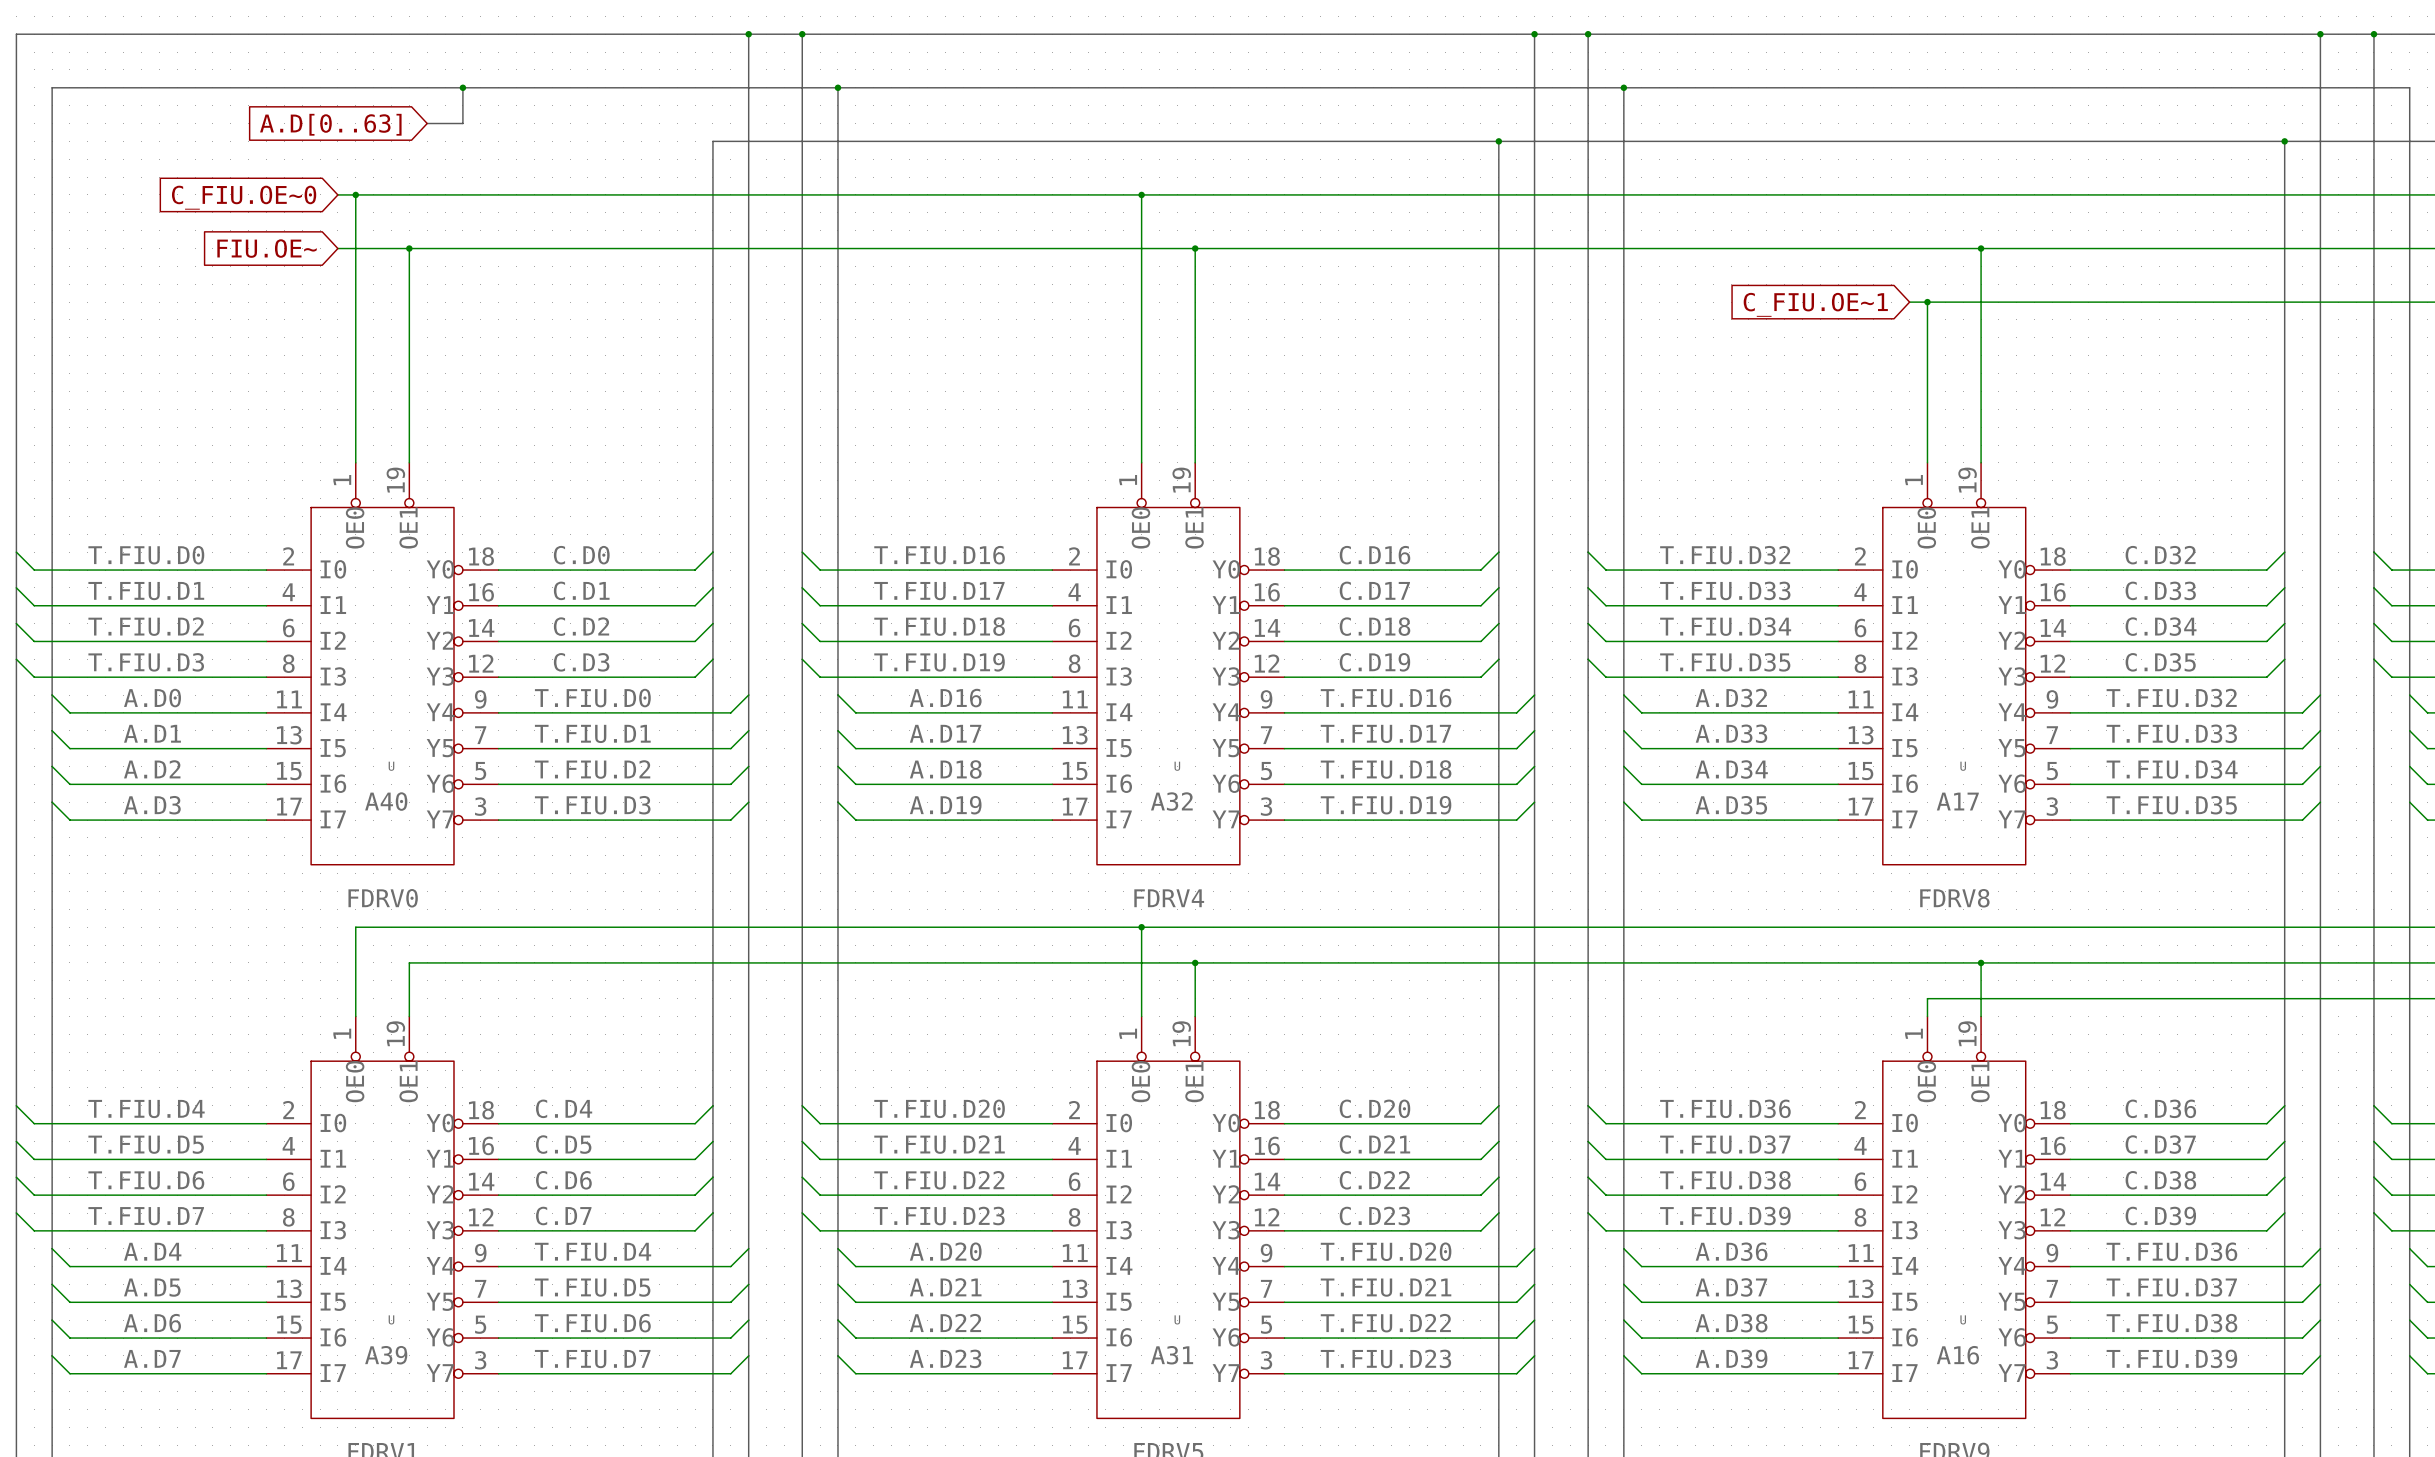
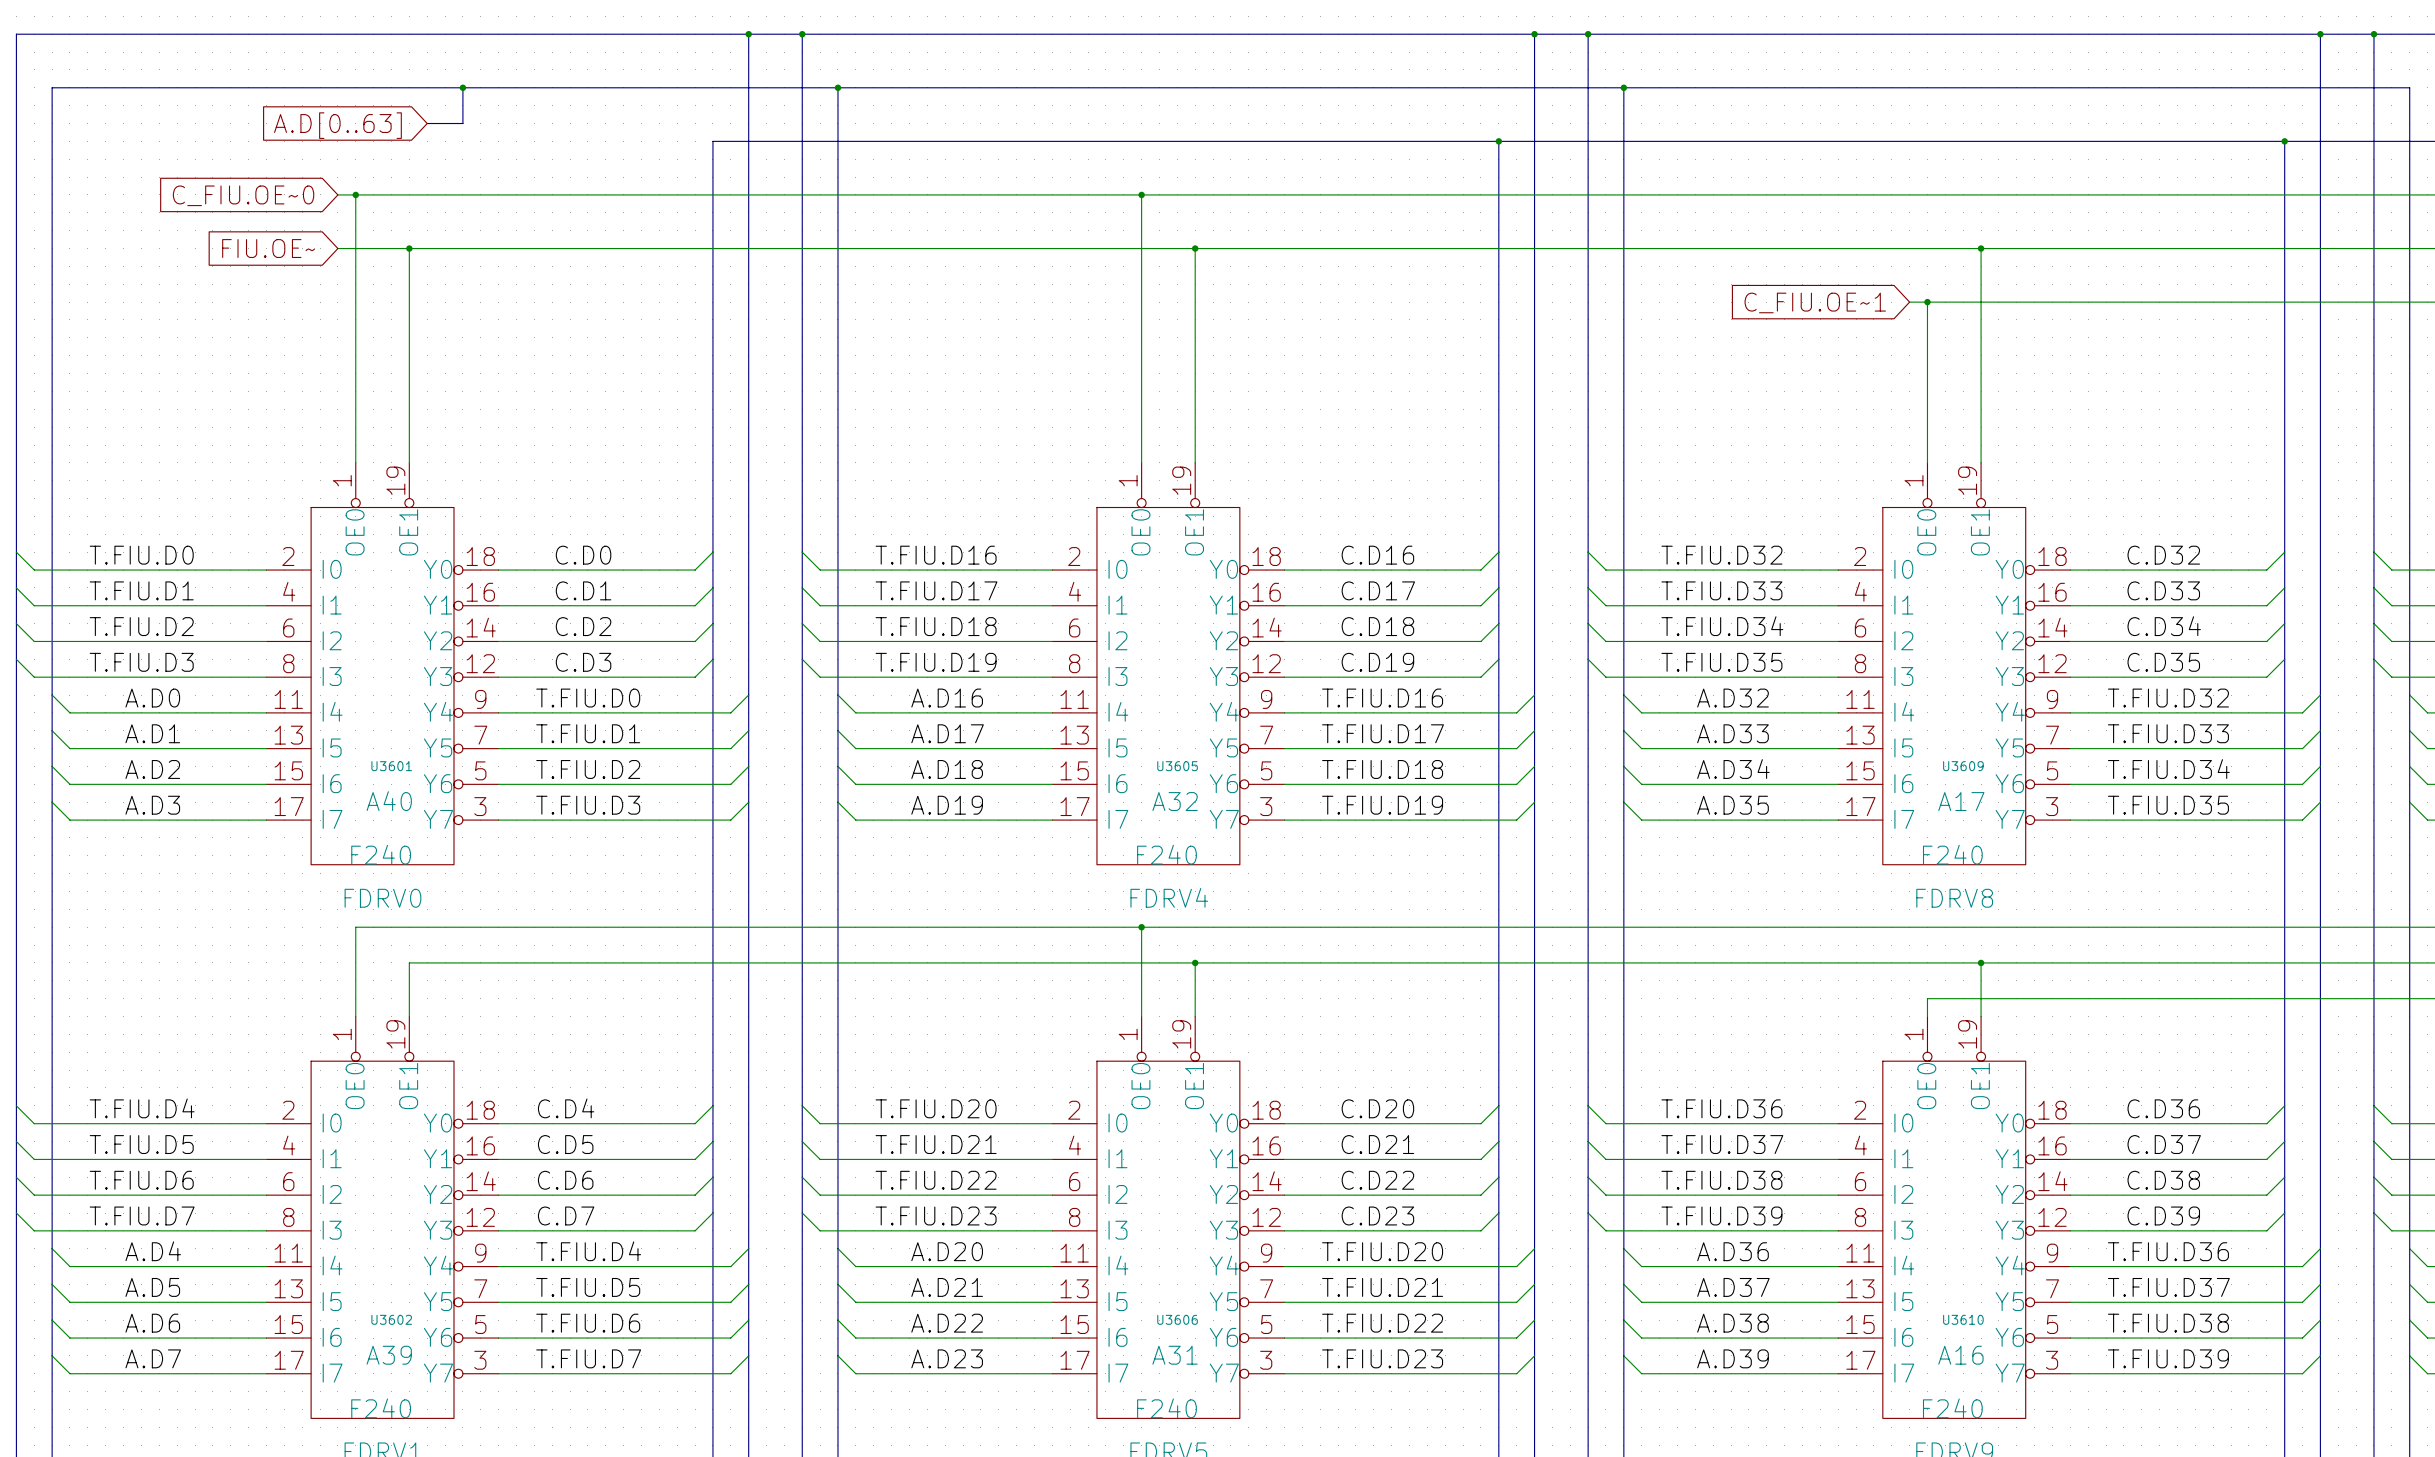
U name: U (391, 766) -> U3601 (391, 766)
U name: U (1177, 766) -> U3605 (1177, 766)
U name: U (1963, 766) -> U3609 (1963, 766)
U value: none -> F240 (381, 854)
U value: none -> F240 (1166, 854)
U value: none -> F240 (1952, 854)
U name: U (391, 1319) -> U3602 (391, 1319)
U name: U (1177, 1319) -> U3606 (1177, 1319)
U name: U (1963, 1319) -> U3610 (1963, 1319)
U value: none -> F240 (381, 1408)
U value: none -> F240 (1166, 1408)
U value: none -> F240 (1952, 1408)

